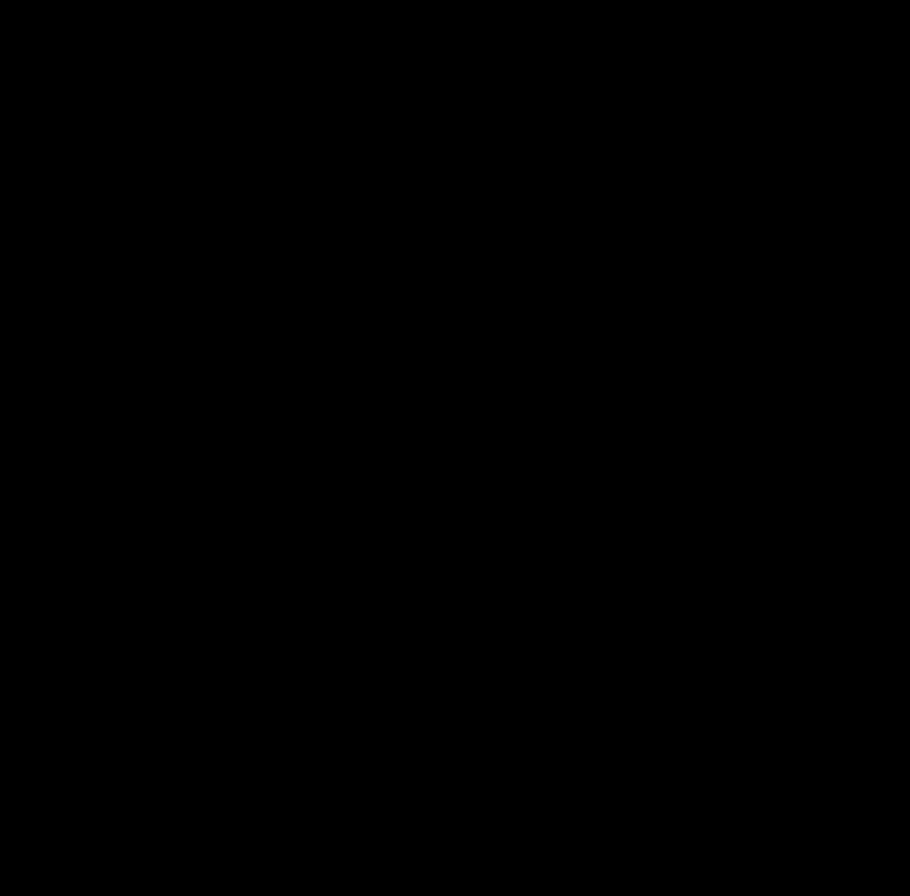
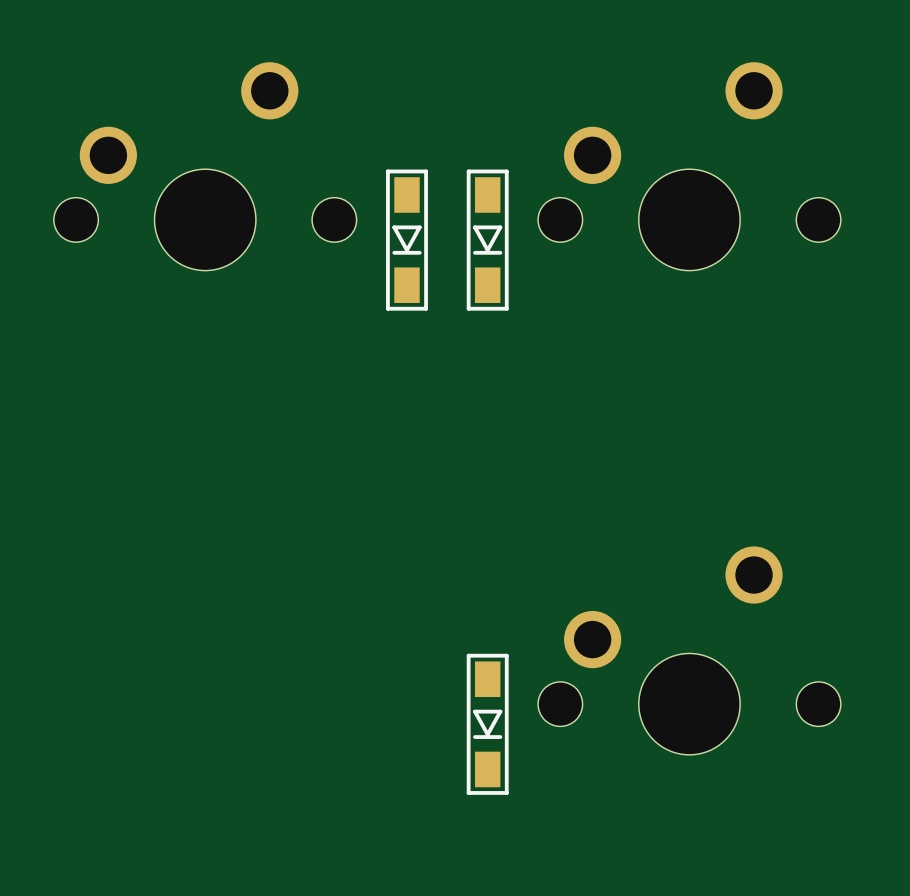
part: none -> (205, 166)
part: none -> (689, 166)
part: none -> (406, 240)
part: none -> (487, 240)
part: none -> (689, 650)
part: none -> (487, 724)

